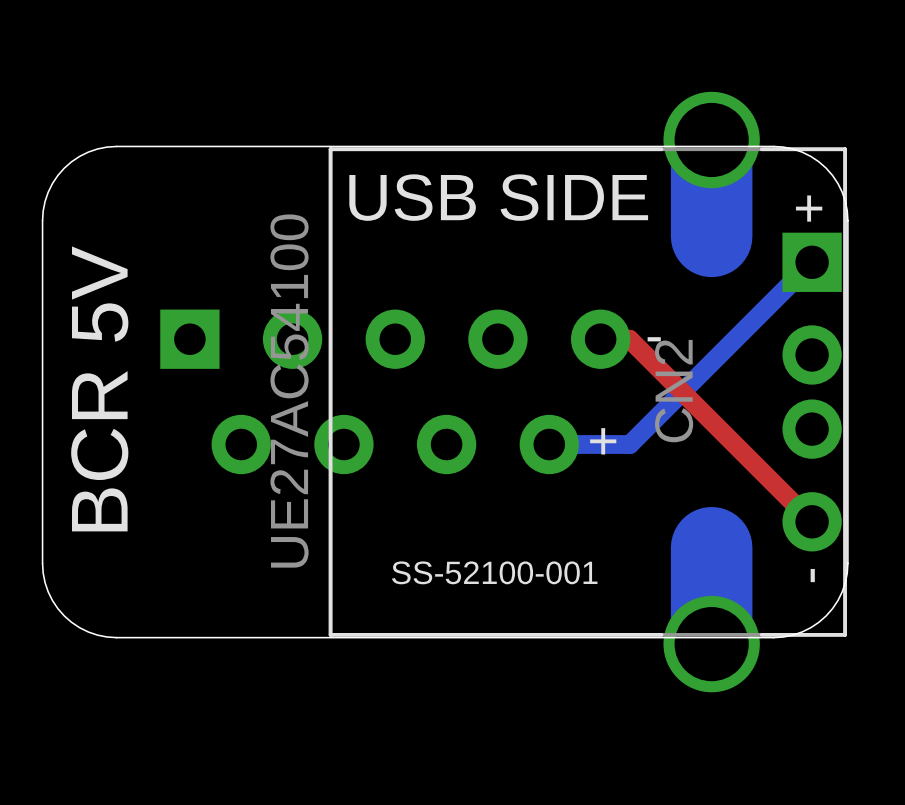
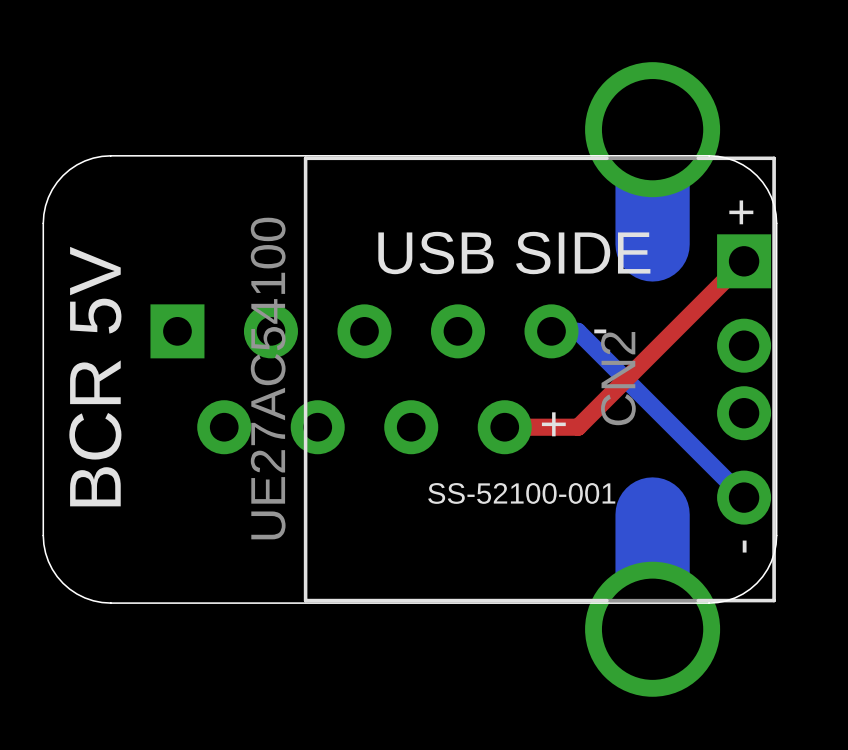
CN2 footprint: [328, 91, 847, 693] -> [303, 62, 776, 697]
text position: USB SIDE (498, 197) -> USB SIDE (514, 253)
bottom track: (812, 262) (629, 444) (549, 444) -> none
top track: none -> (744, 261) (578, 427) (504, 427)
bottom track: none -> (551, 331) (577, 331) (744, 497)
top track: (600, 339) (629, 339) (812, 521) -> none
text position: SS-52100-001 (494, 572) -> SS-52100-001 (521, 493)

